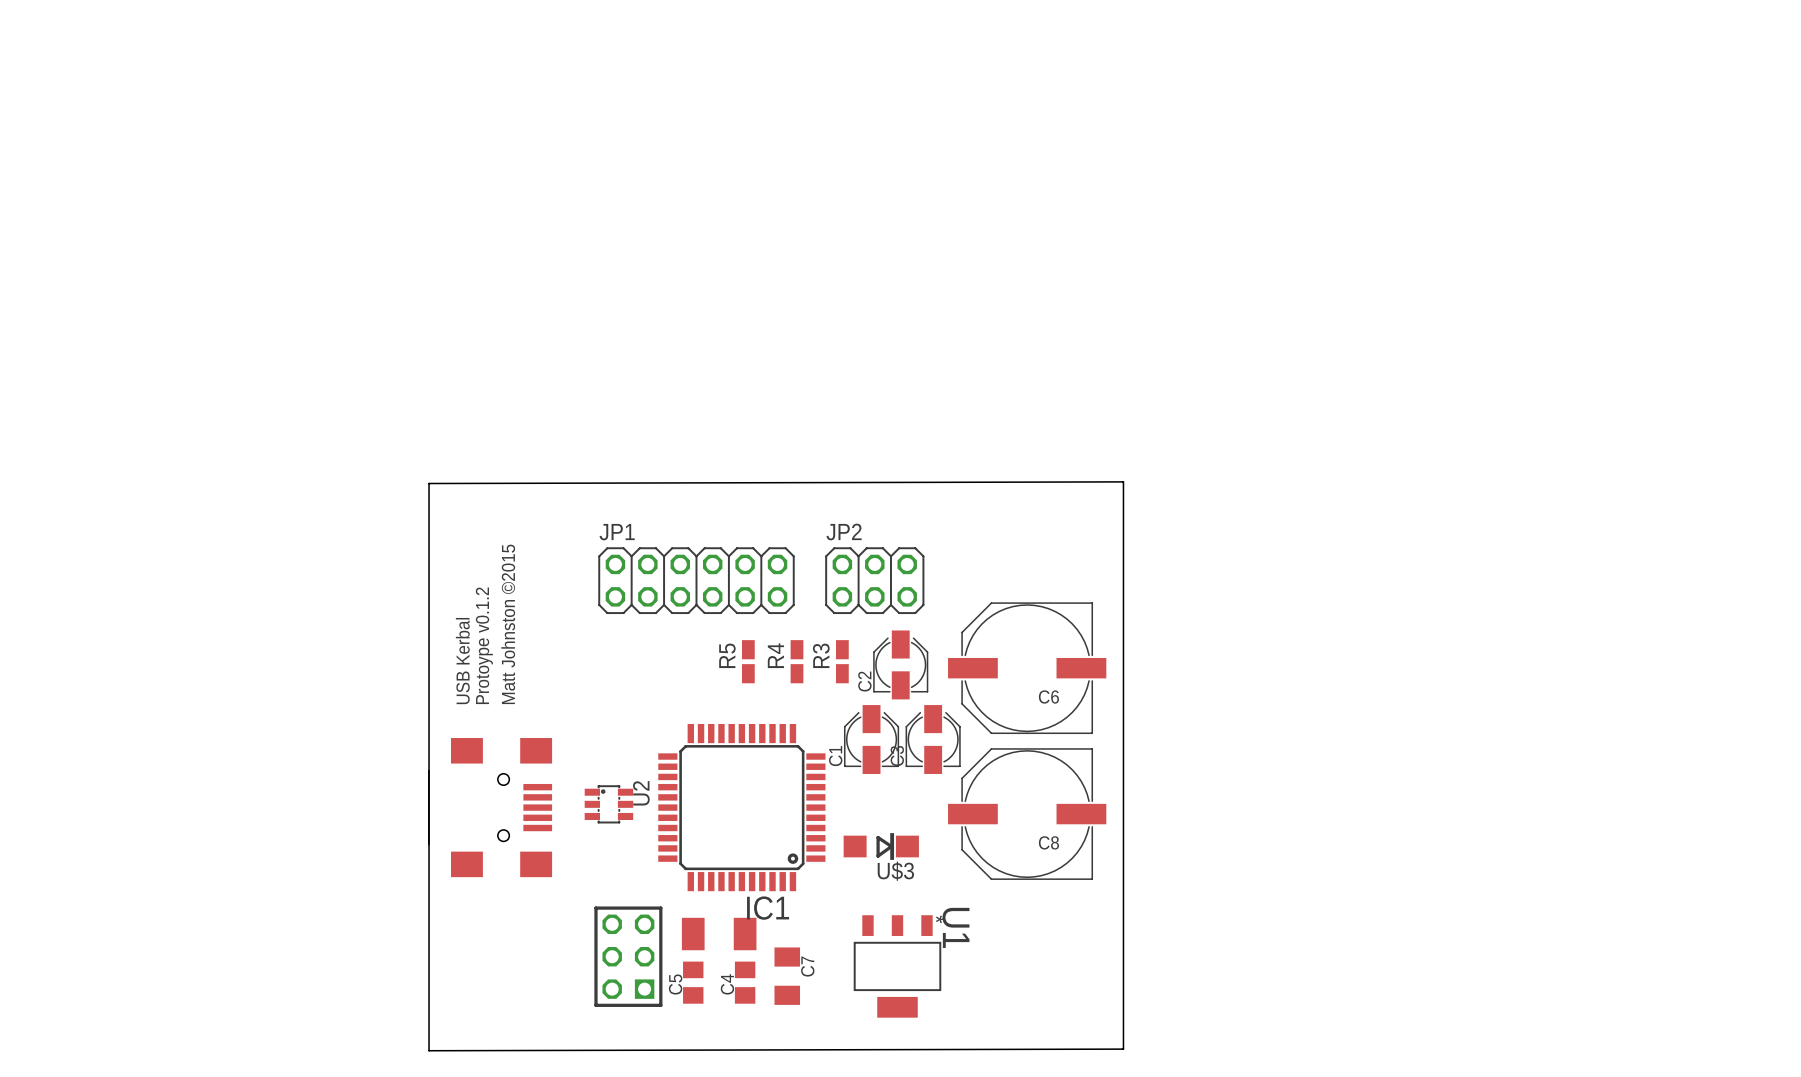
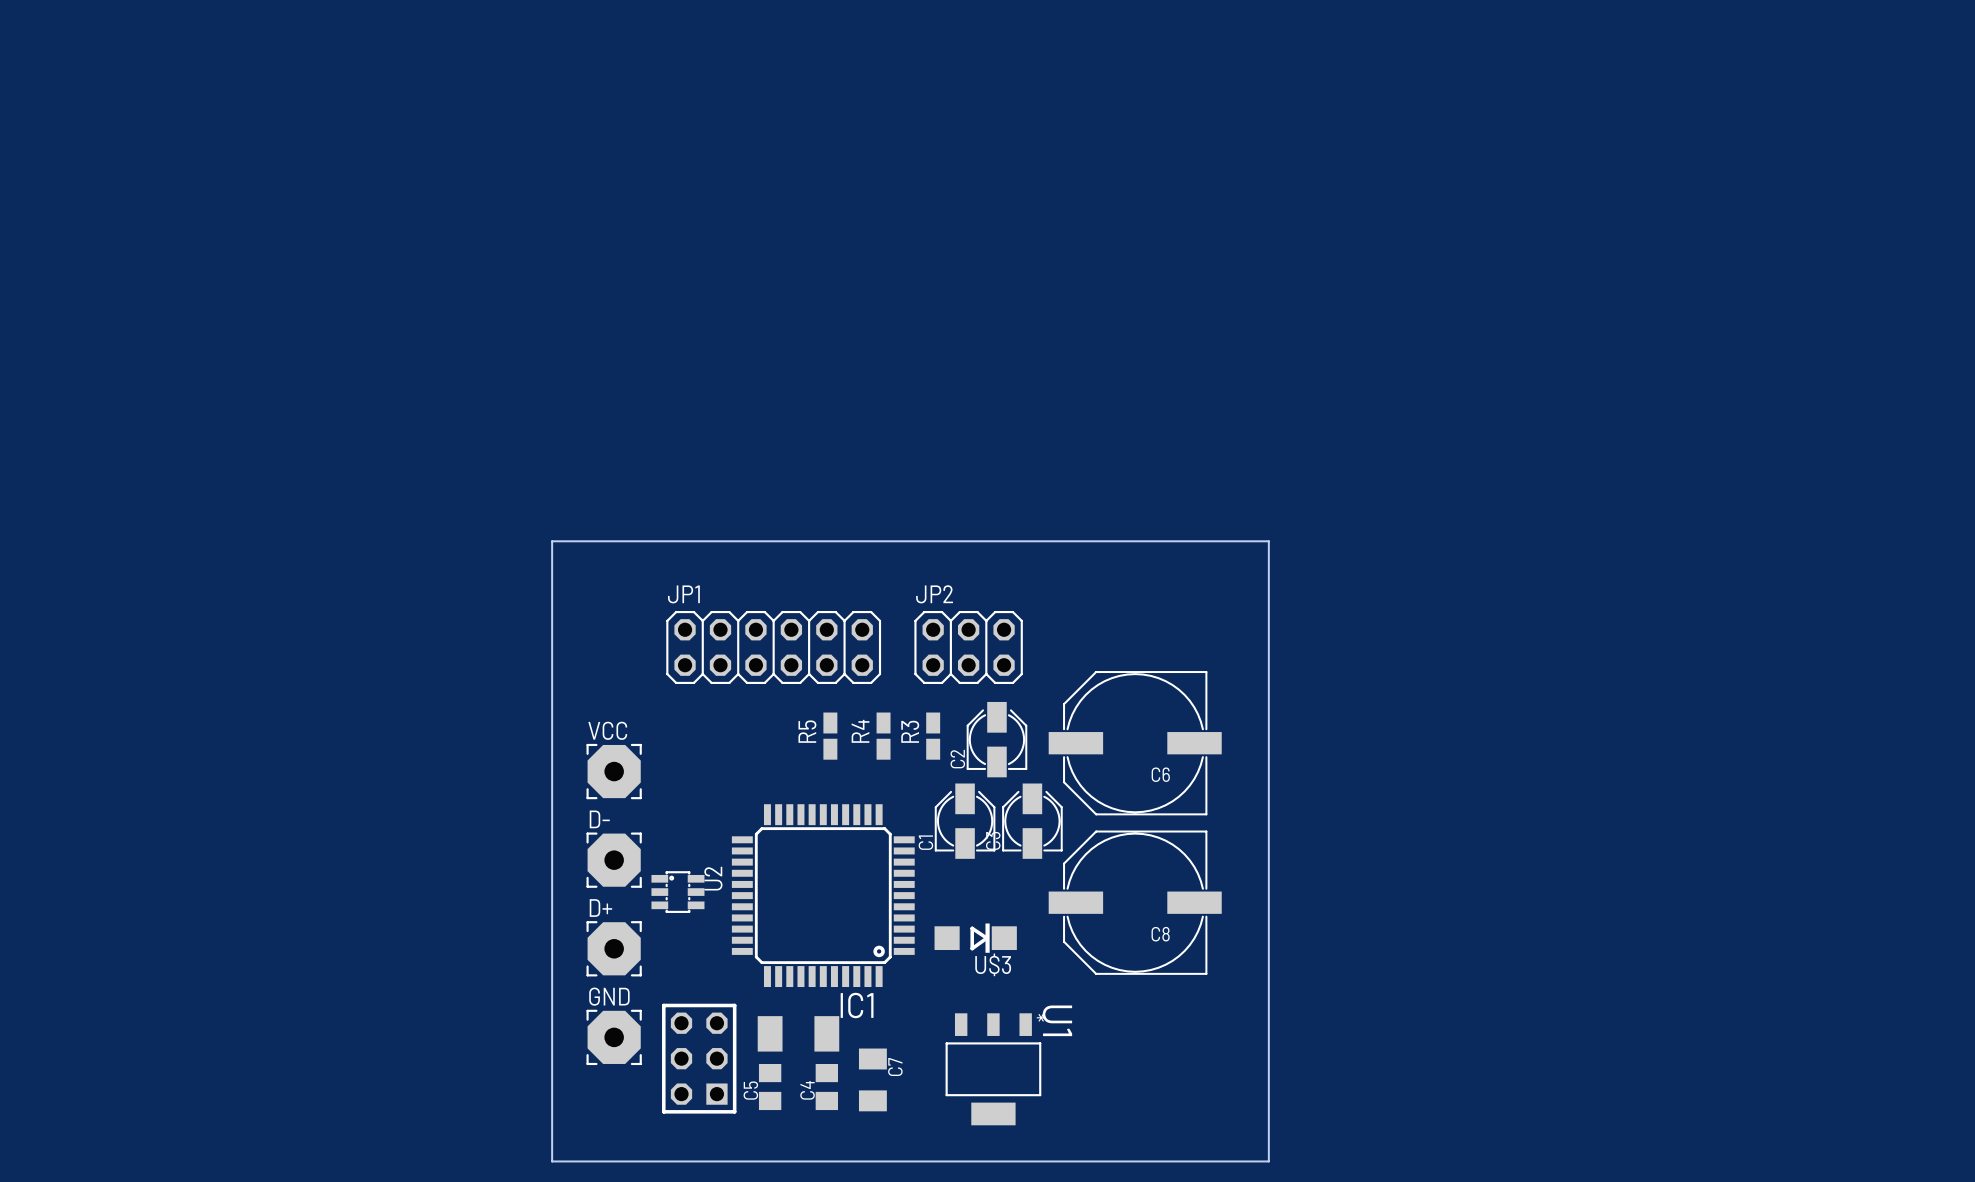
board edge: (1123, 481) (1123, 1049) (429, 1050) (429, 483) (1123, 481) -> (552, 541) (552, 1161) (1268, 1161) (1268, 541) (552, 541)
text: Matt Johnston ©2015 (508, 624) -> none
text: Protoype v0.1.2 (484, 645) -> none
text: USB Kerbal (462, 661) -> none
VCC: none -> (614, 771)
D-: none -> (614, 860)
part: (490, 807) -> none
D+: none -> (614, 948)
GND: none -> (614, 1037)

